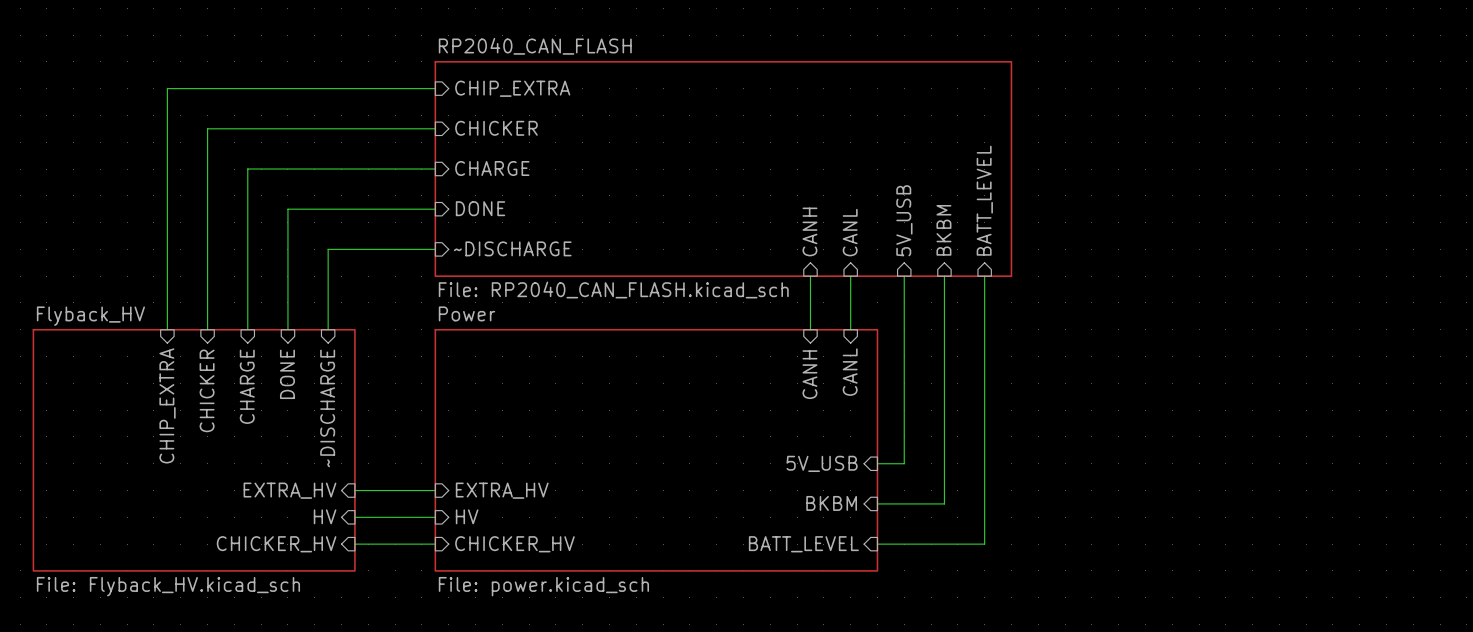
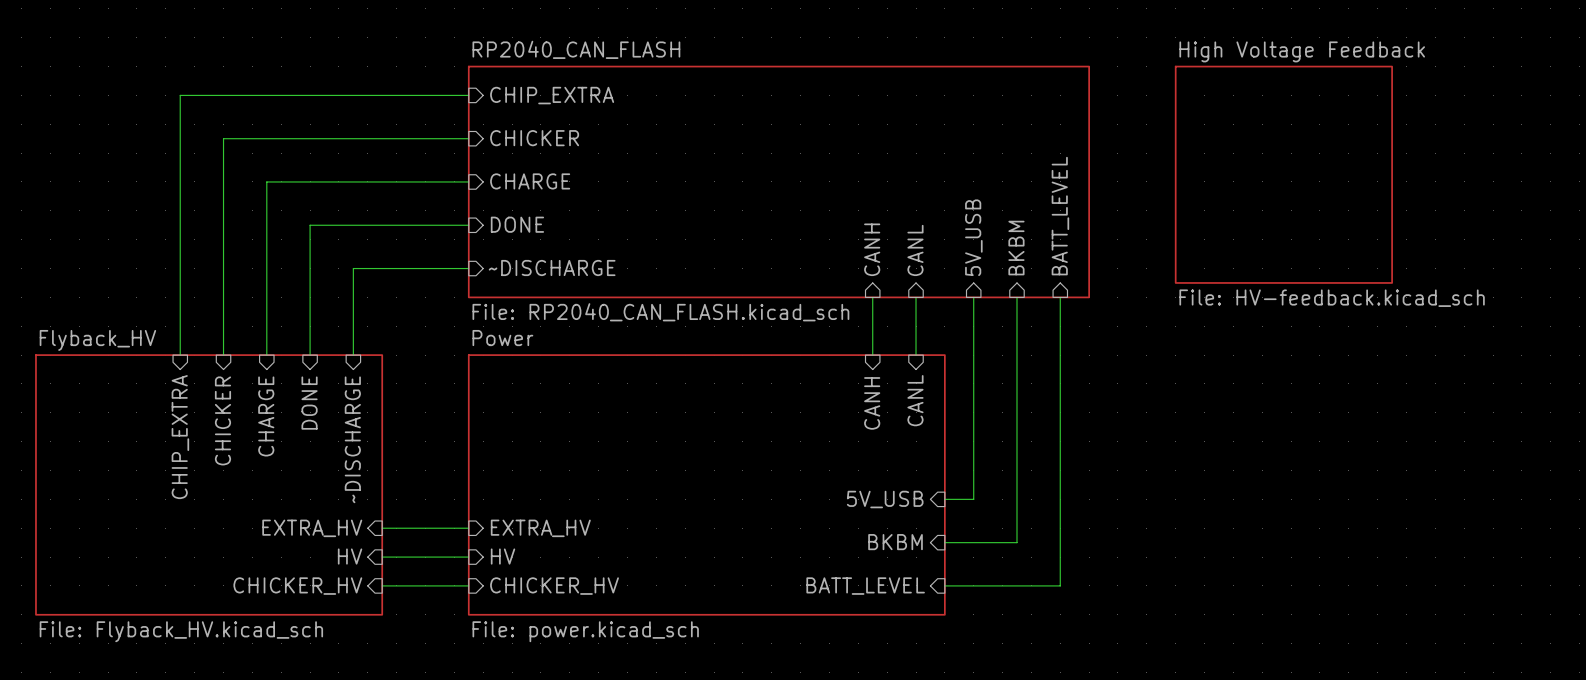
sheet High Voltage Feedback: none -> File: HV-feedback.kicad_sch (1283, 174)

